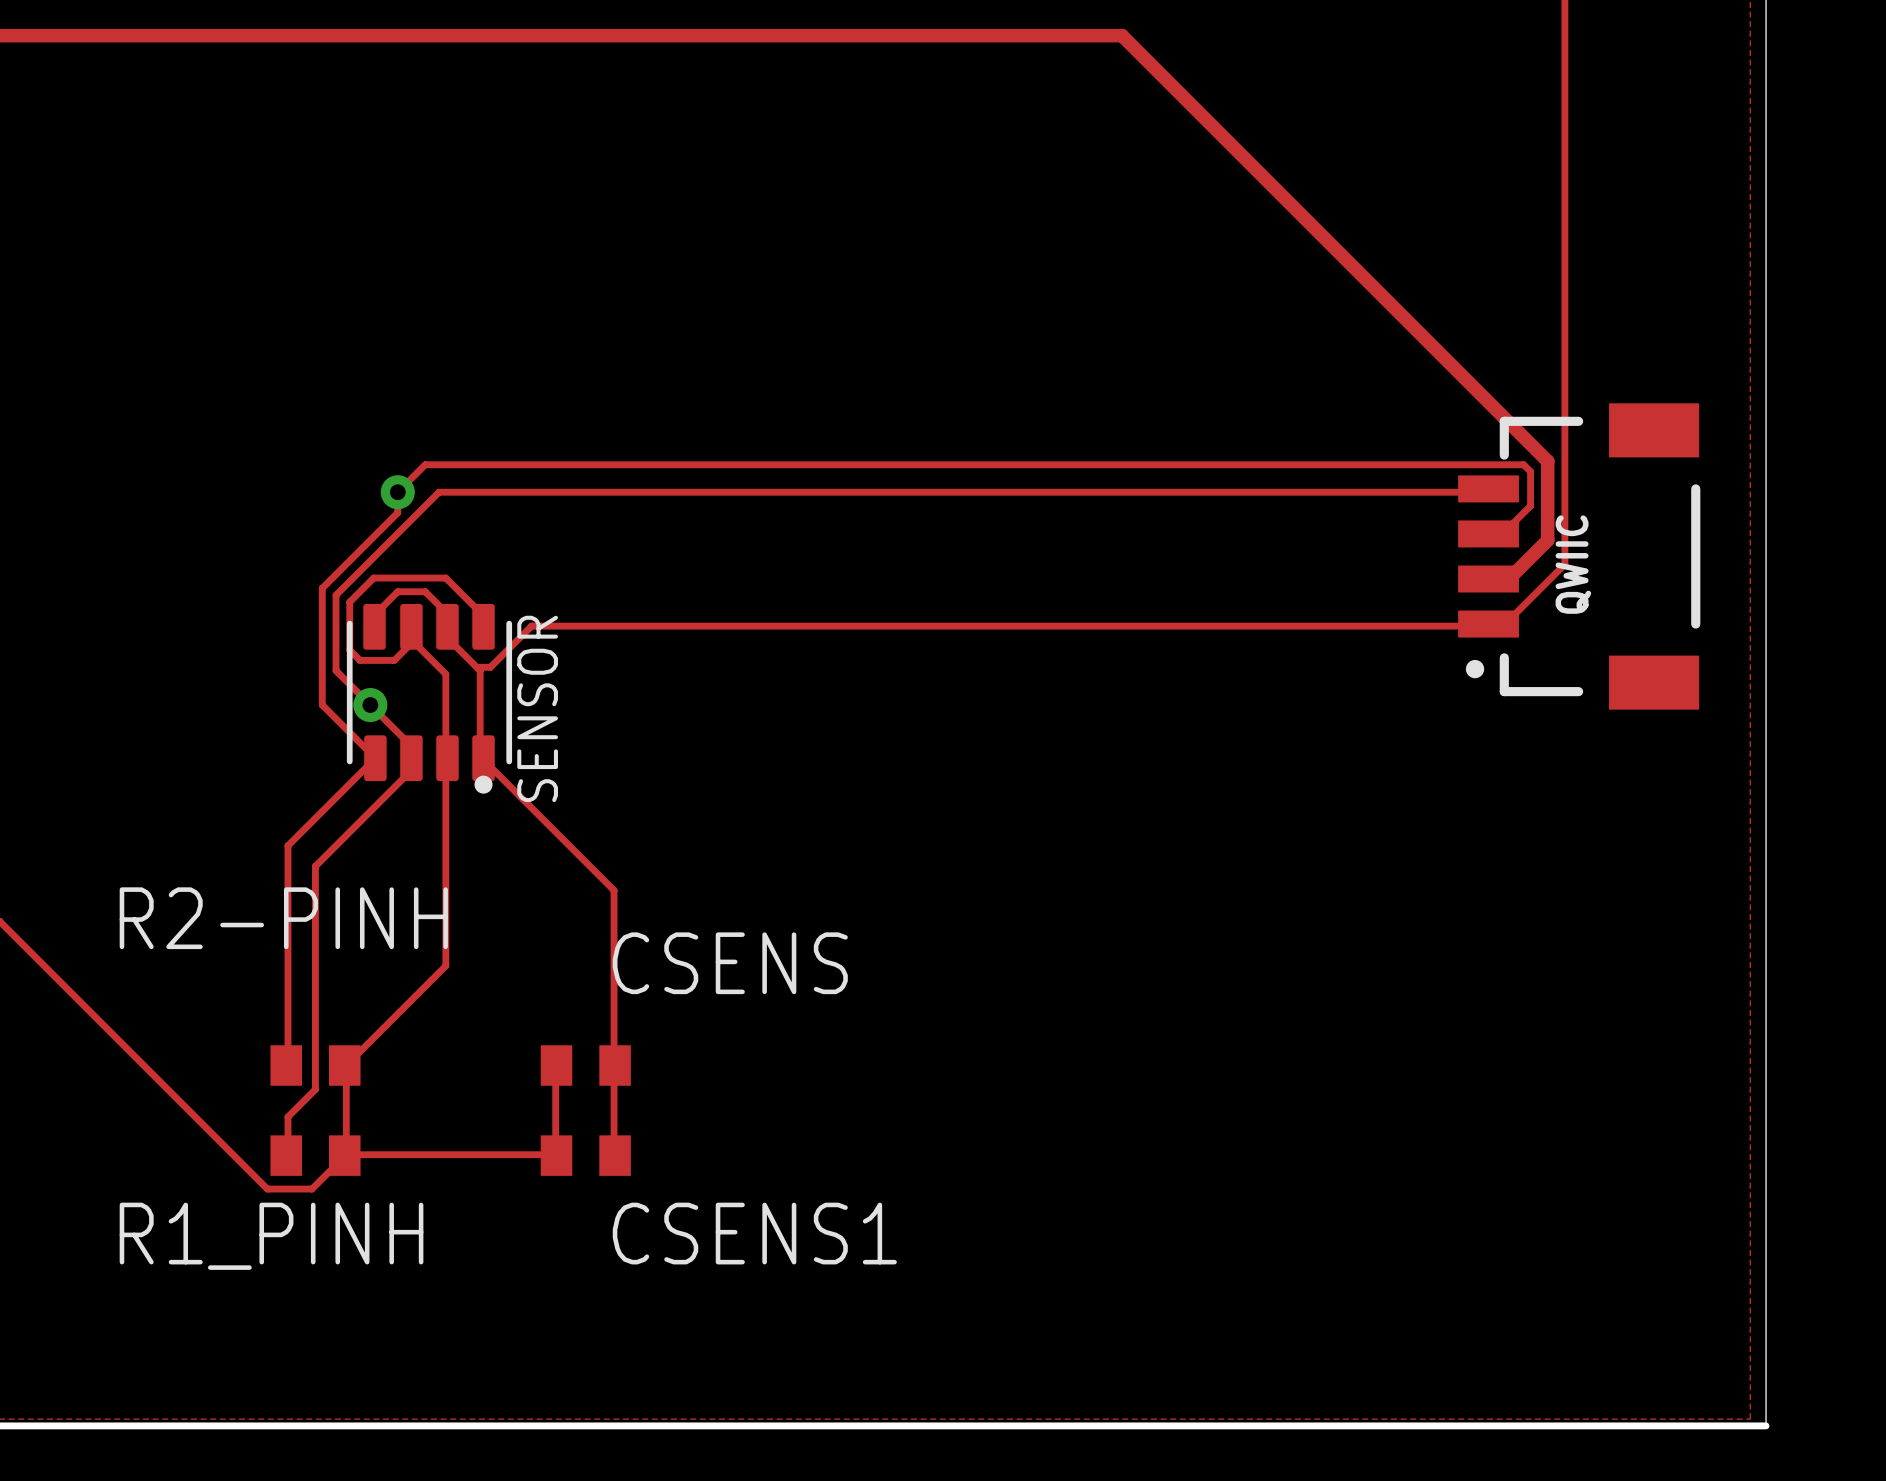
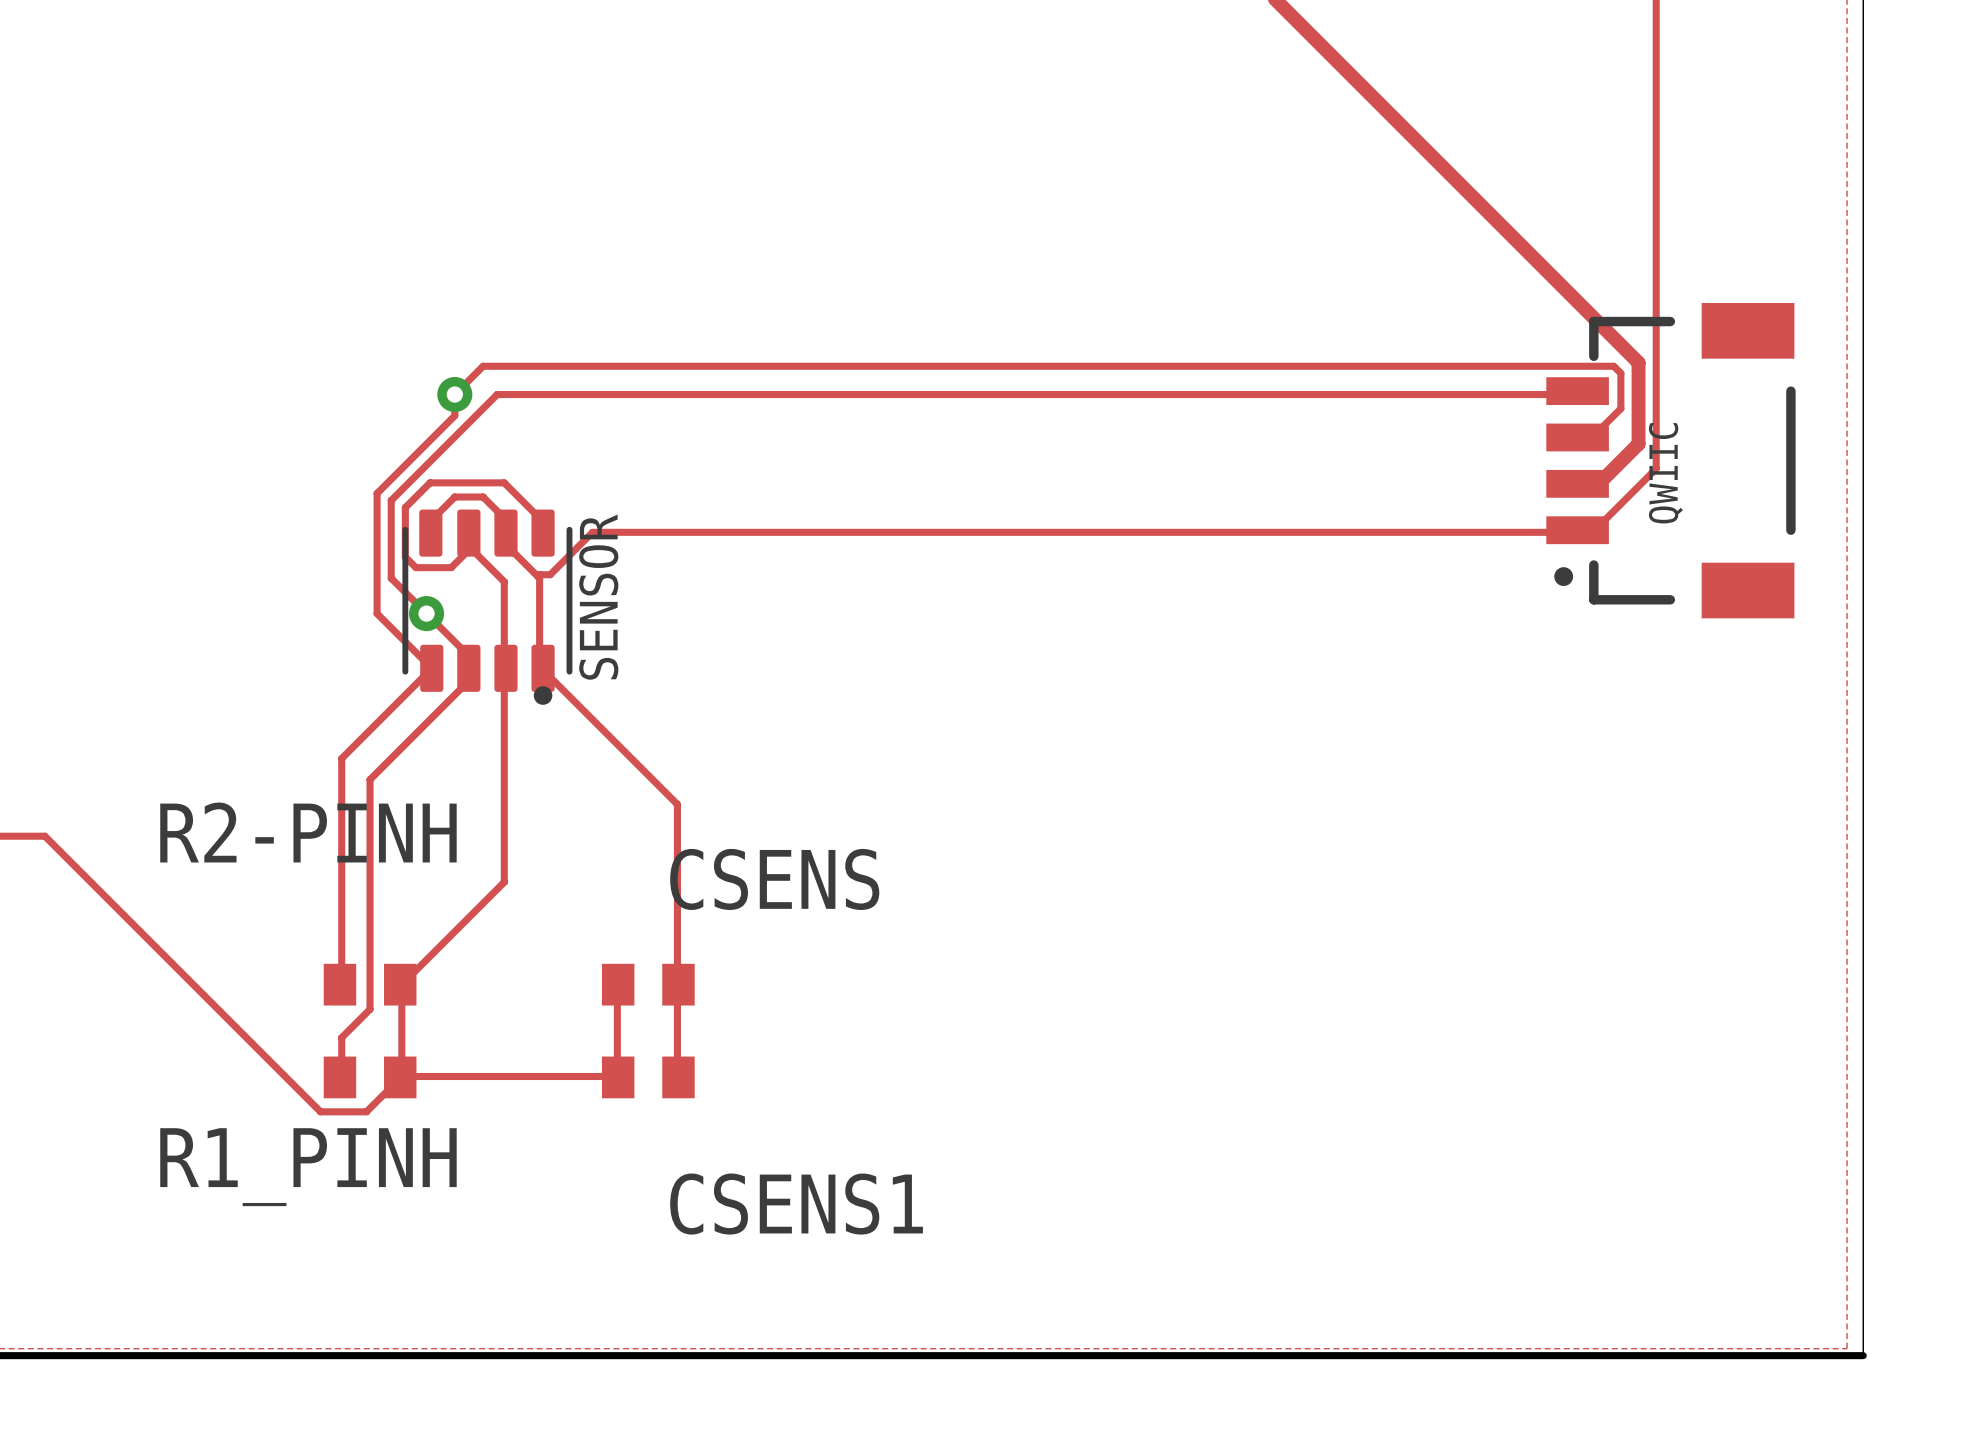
CSENS1 name position: CSENS1 (754, 1233) -> CSENS1 (796, 1204)

